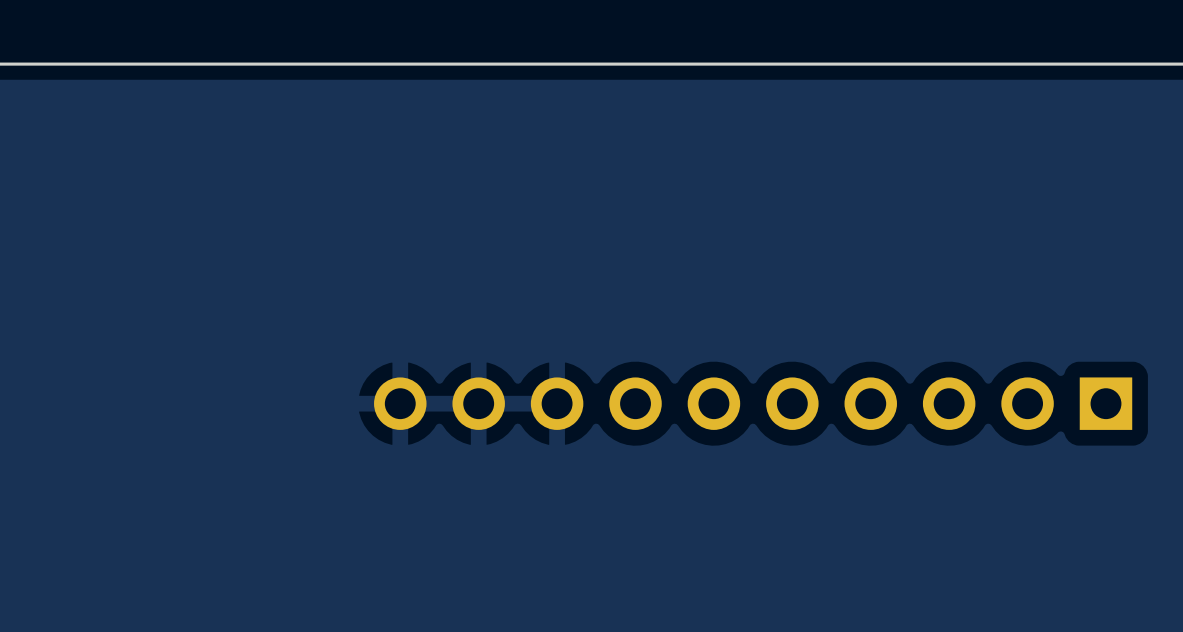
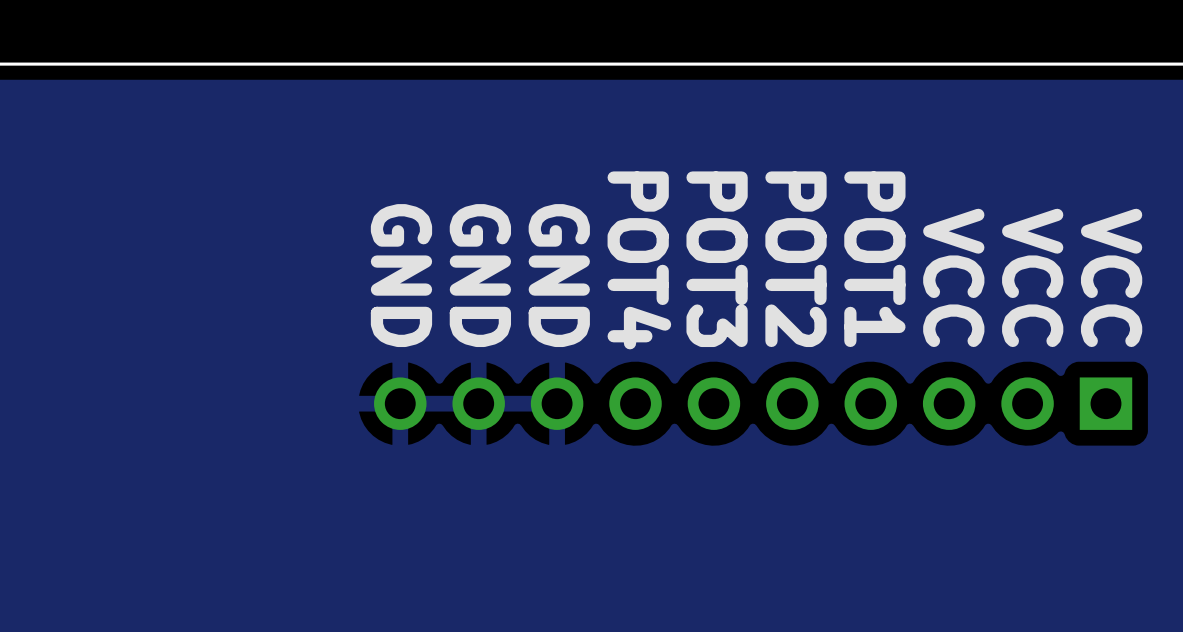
text: none -> POT3 (717, 259)
text: none -> POT2 (795, 259)
text: none -> POT1 (874, 259)
text: none -> POT4 (639, 260)
text: none -> GND (401, 275)
text: none -> GND (480, 275)
text: none -> GND (559, 275)
text: none -> VCC (953, 277)
text: none -> VCC (1032, 277)
text: none -> VCC (1111, 277)

